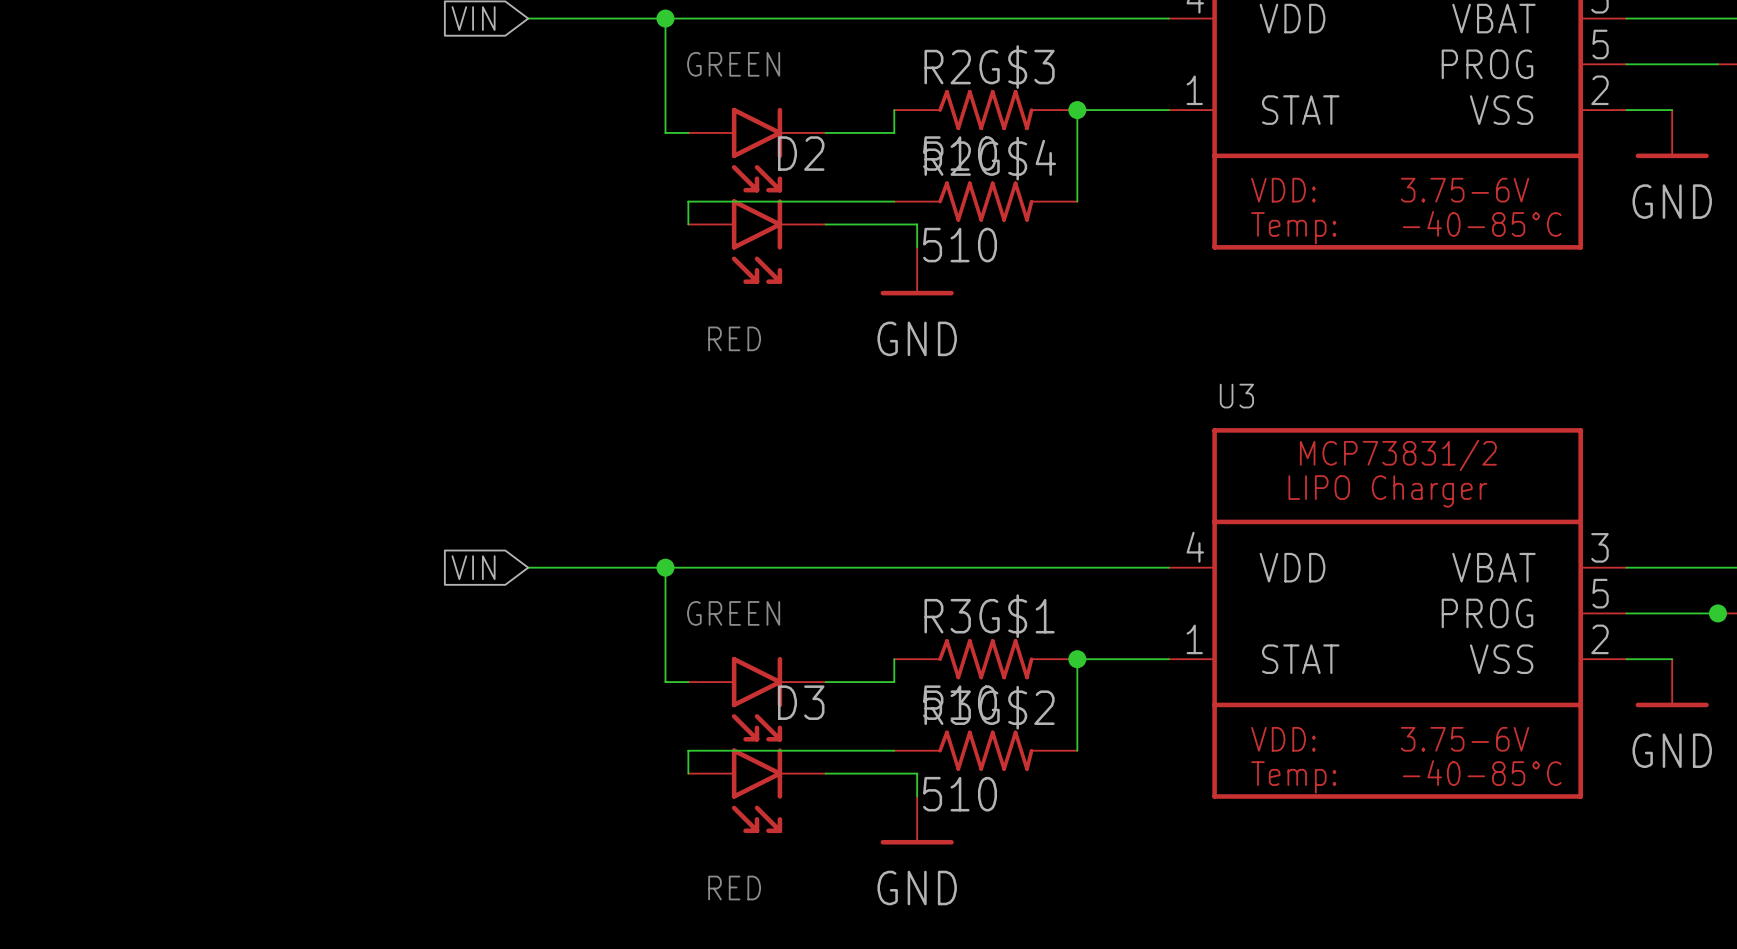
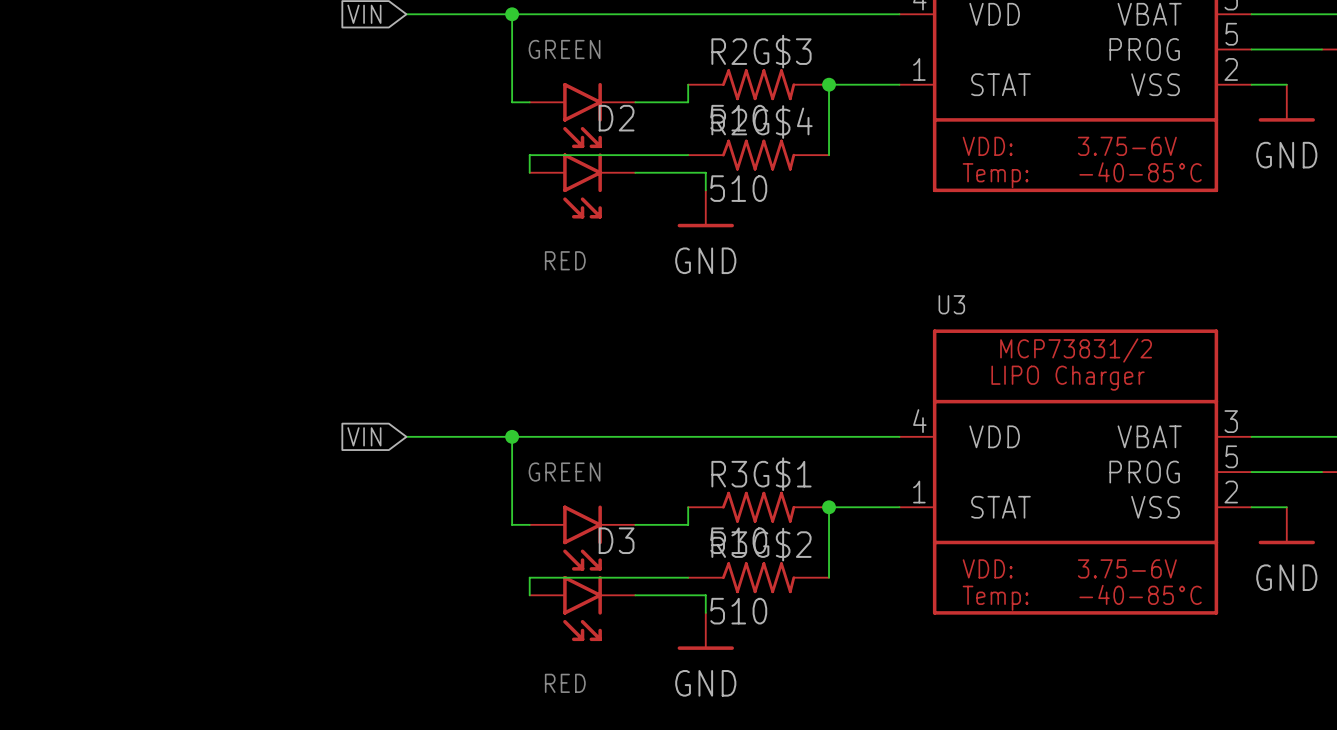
junction: (1717, 613) -> none

